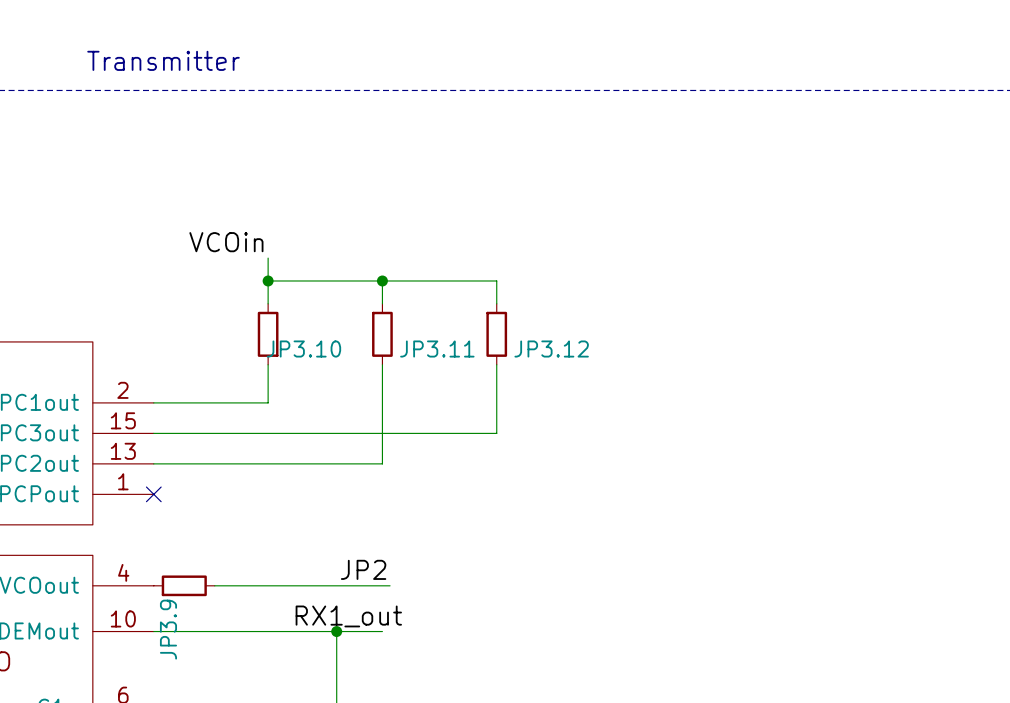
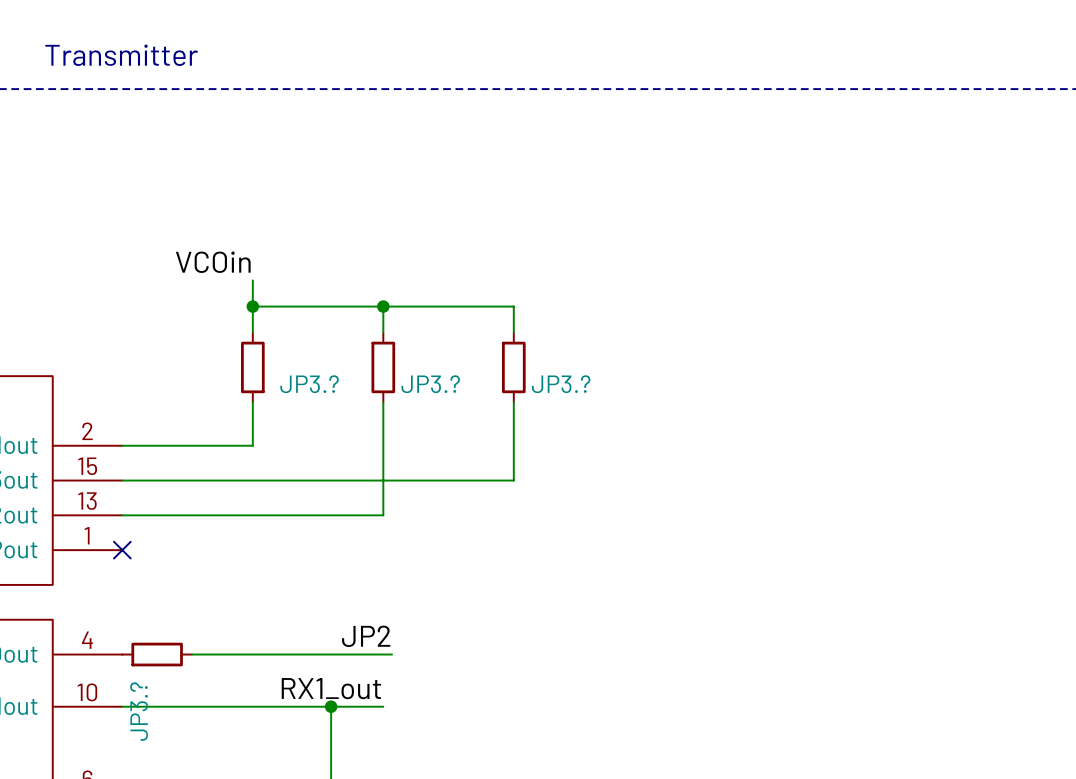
JP3.10 name: JP3.10 (303, 349) -> JP3.? (309, 384)
JP3.11 name: JP3.11 (437, 349) -> JP3.? (430, 384)
JP3.12 name: JP3.12 (551, 349) -> JP3.? (561, 384)
JP3.9 name: JP3.9 (168, 629) -> JP3.? (139, 711)

